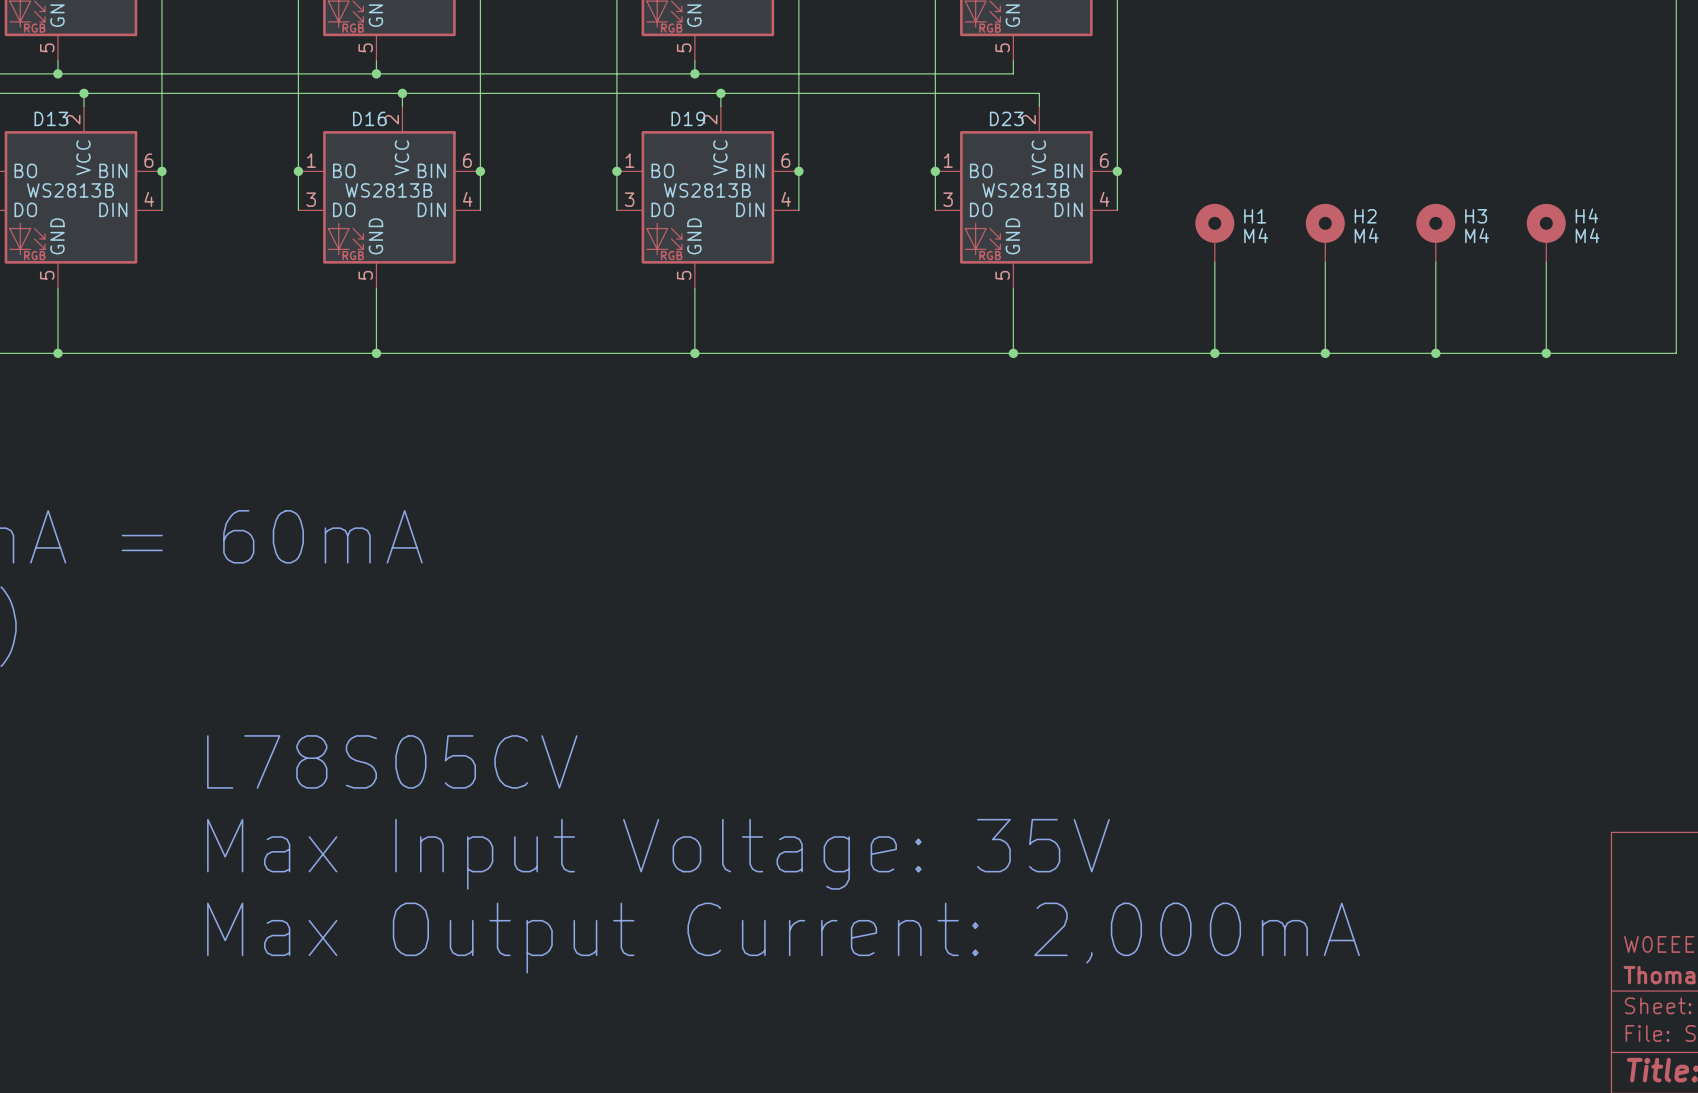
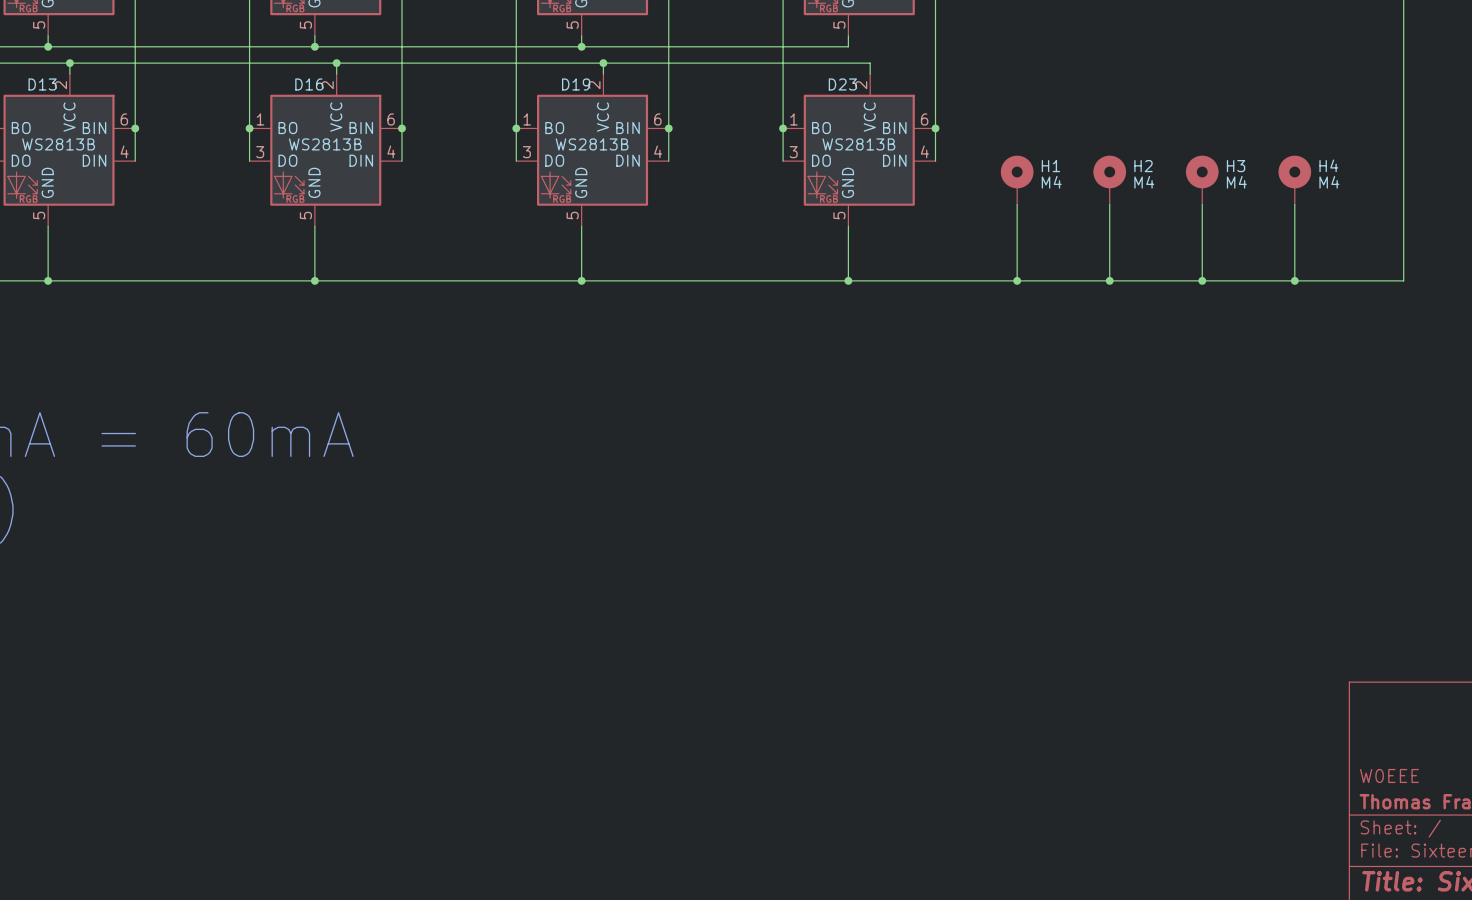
text: L78S05CV (392, 761) -> none
text: Max Input Voltage: 35V (658, 854) -> none
text: Max Output Current: 2,000mA (783, 938) -> none

